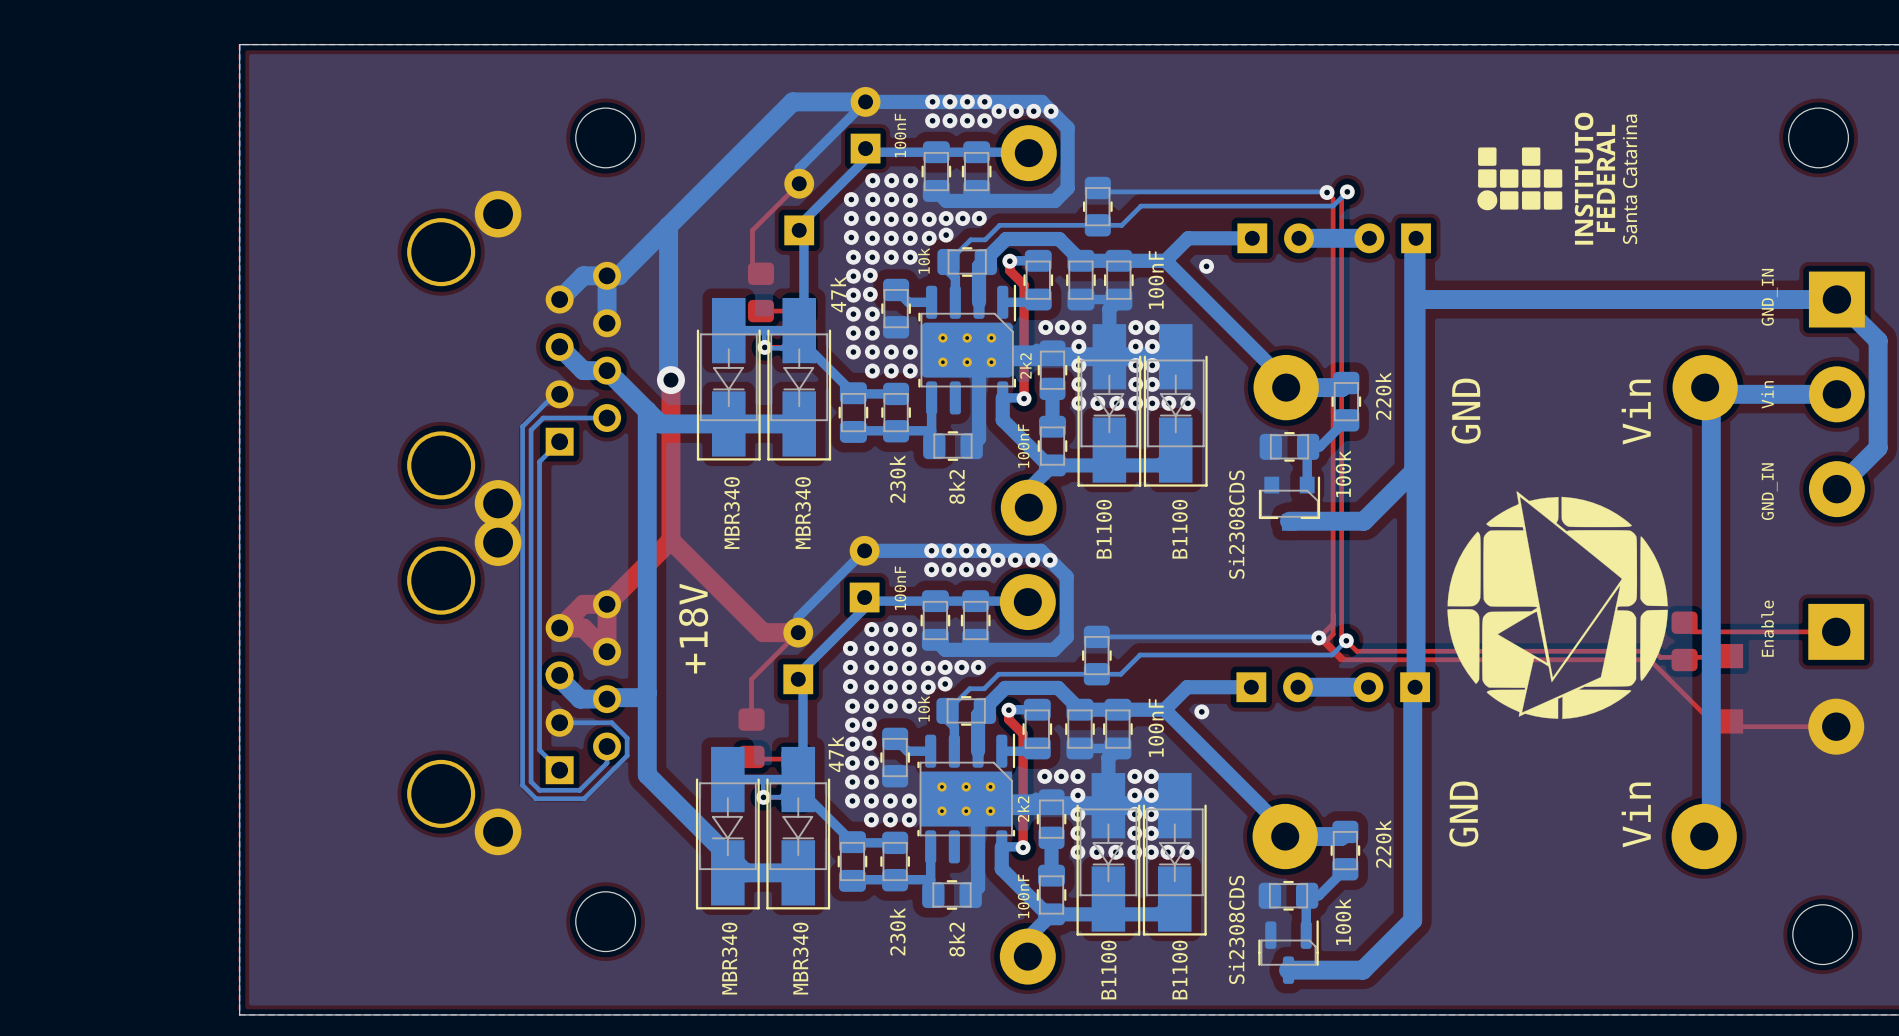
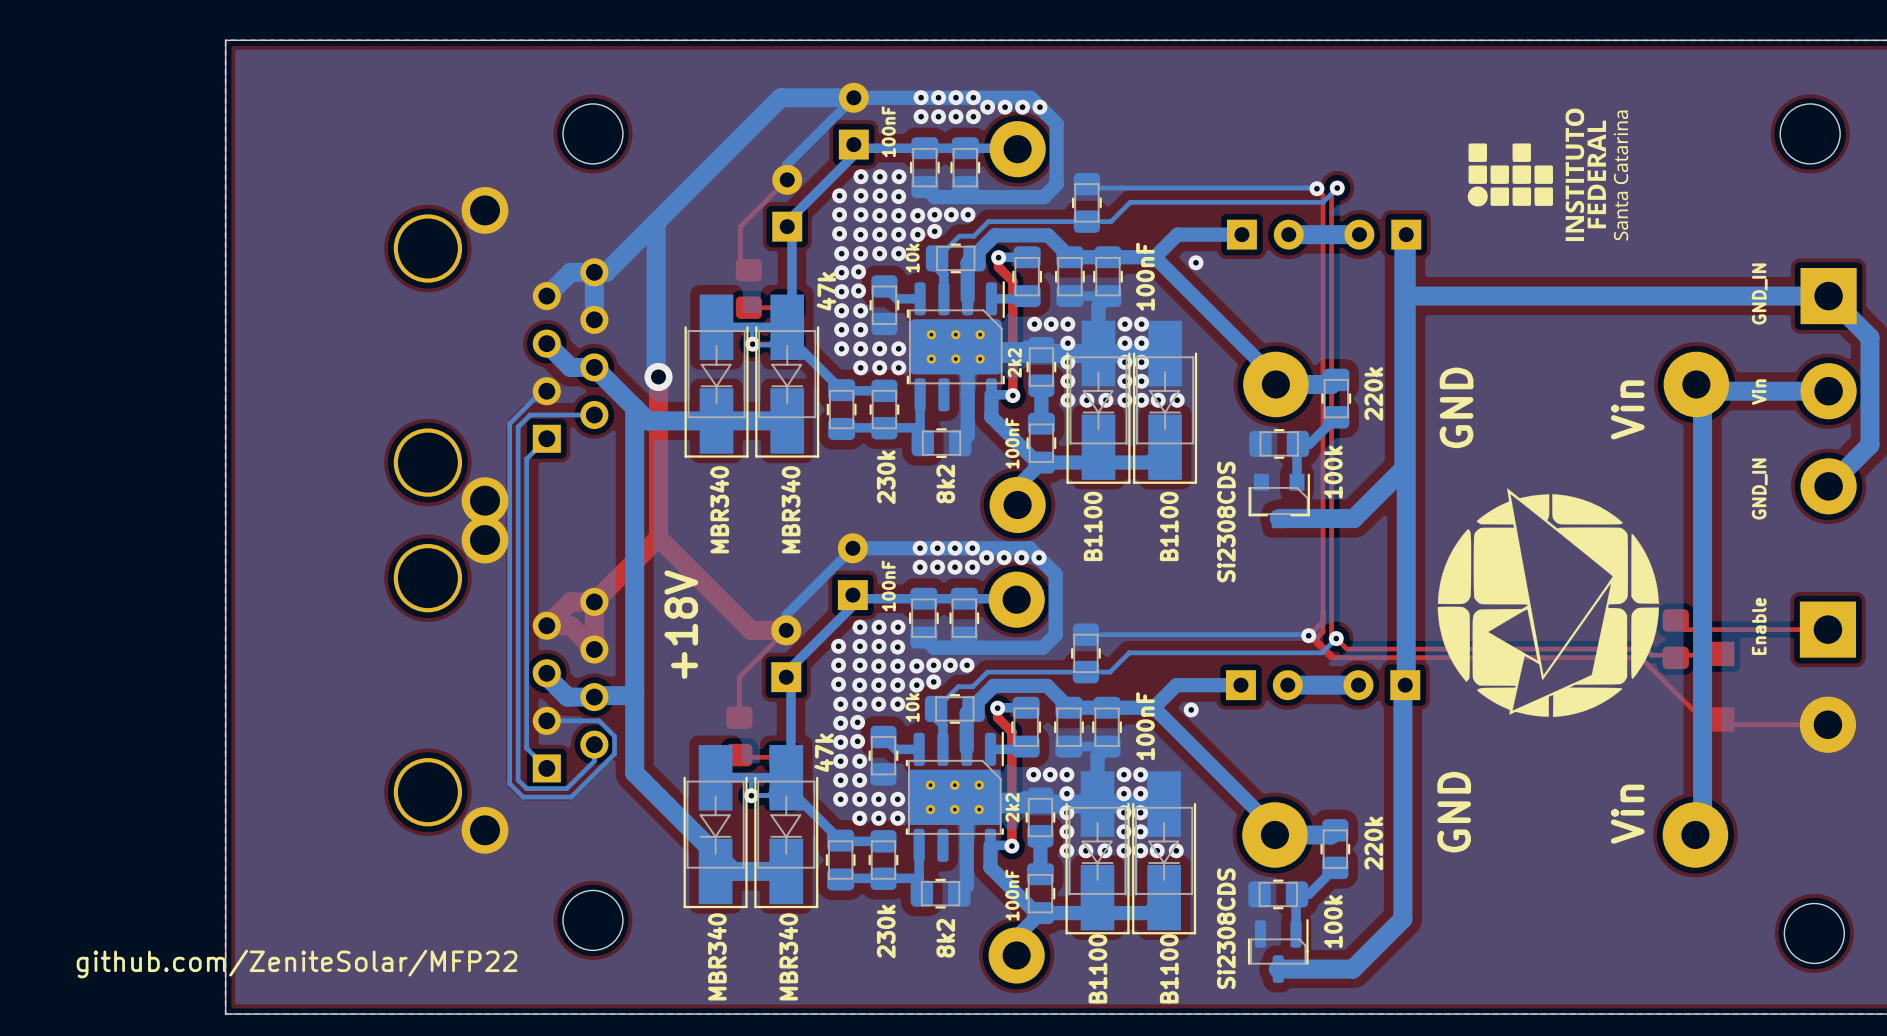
text: none -> github.com/ZeniteSolar/MFP22 (297, 963)

